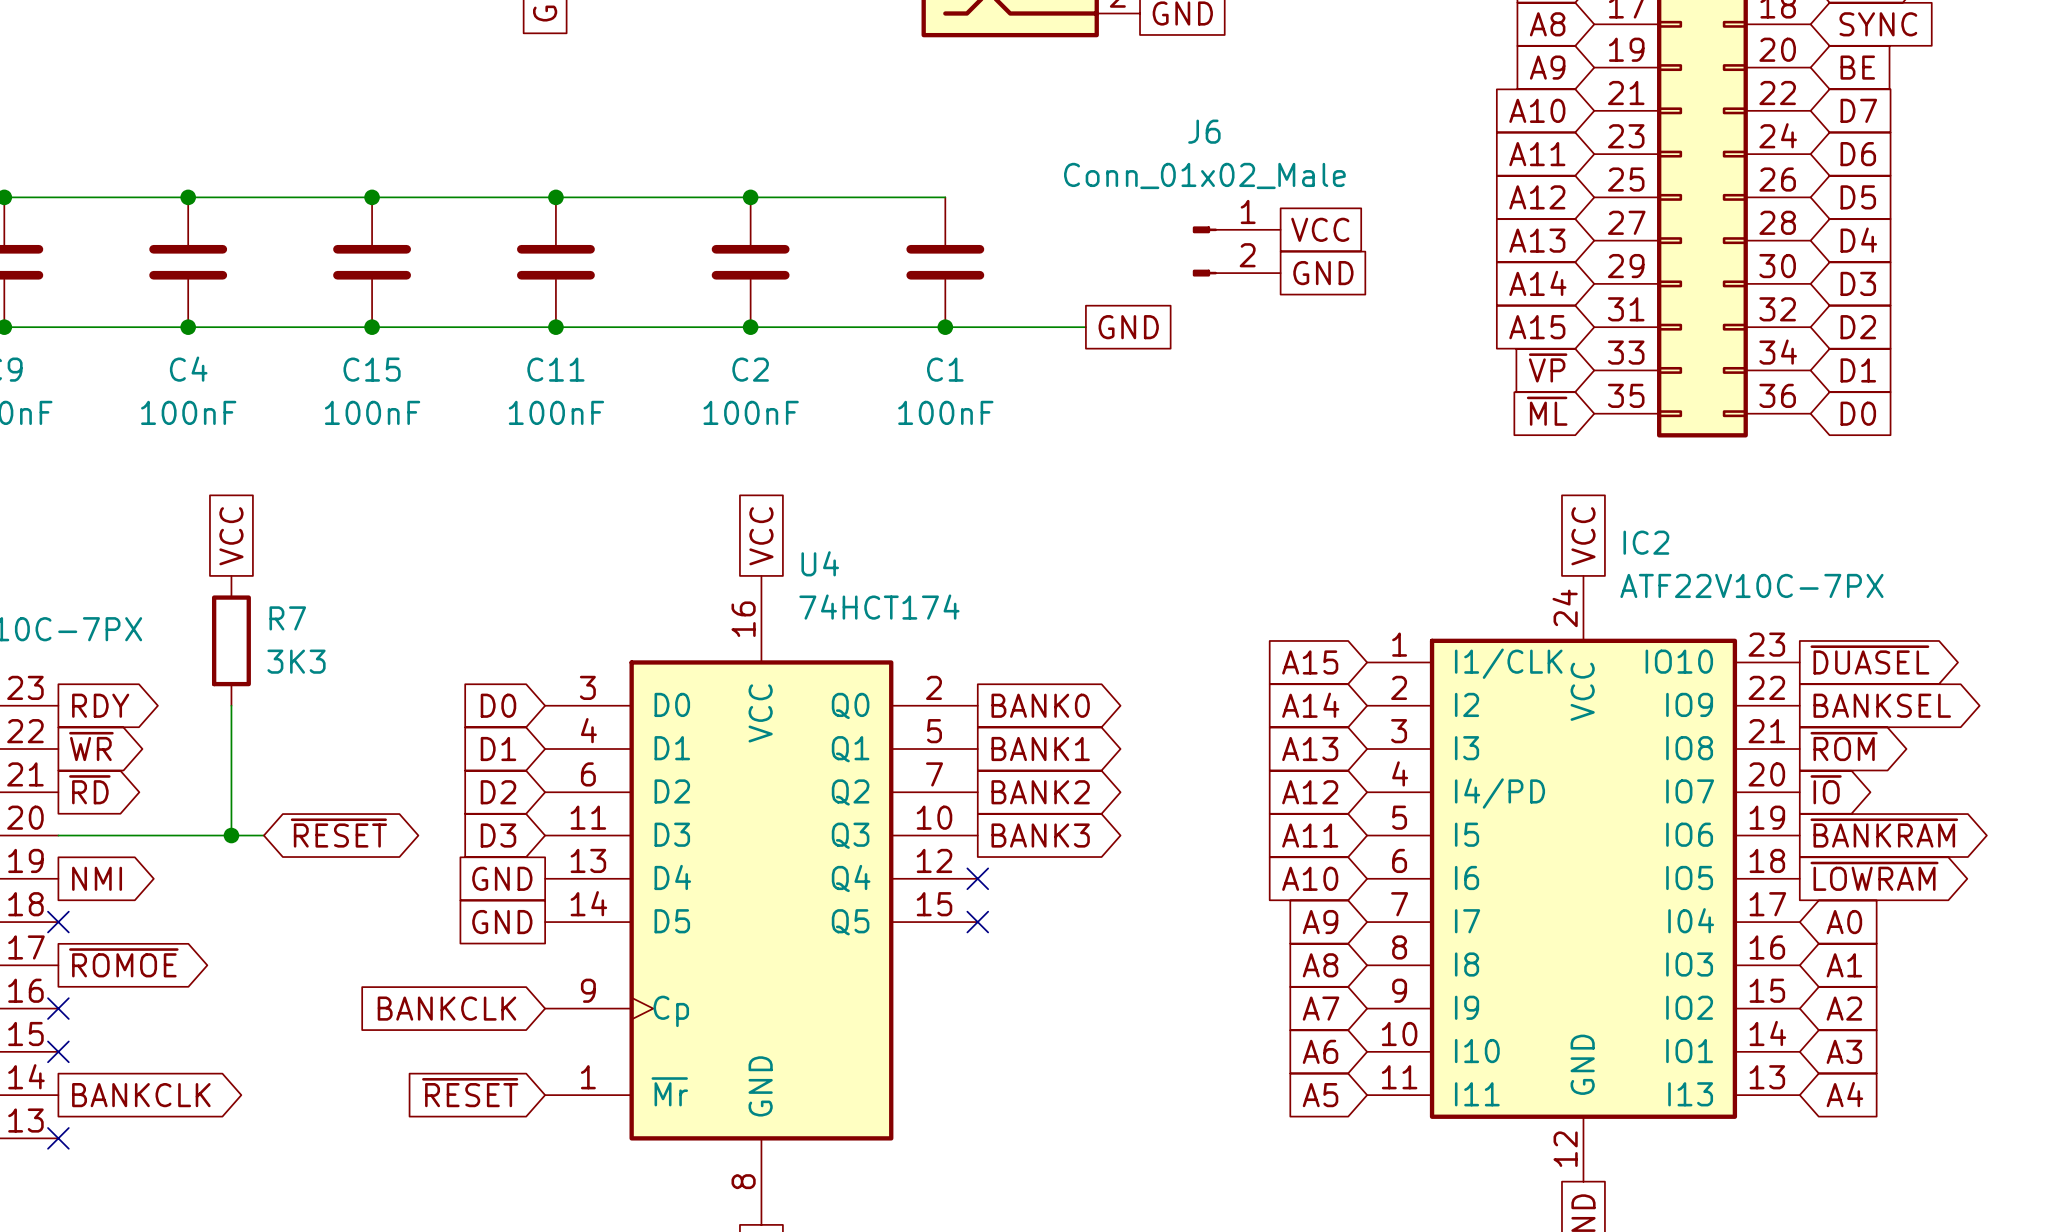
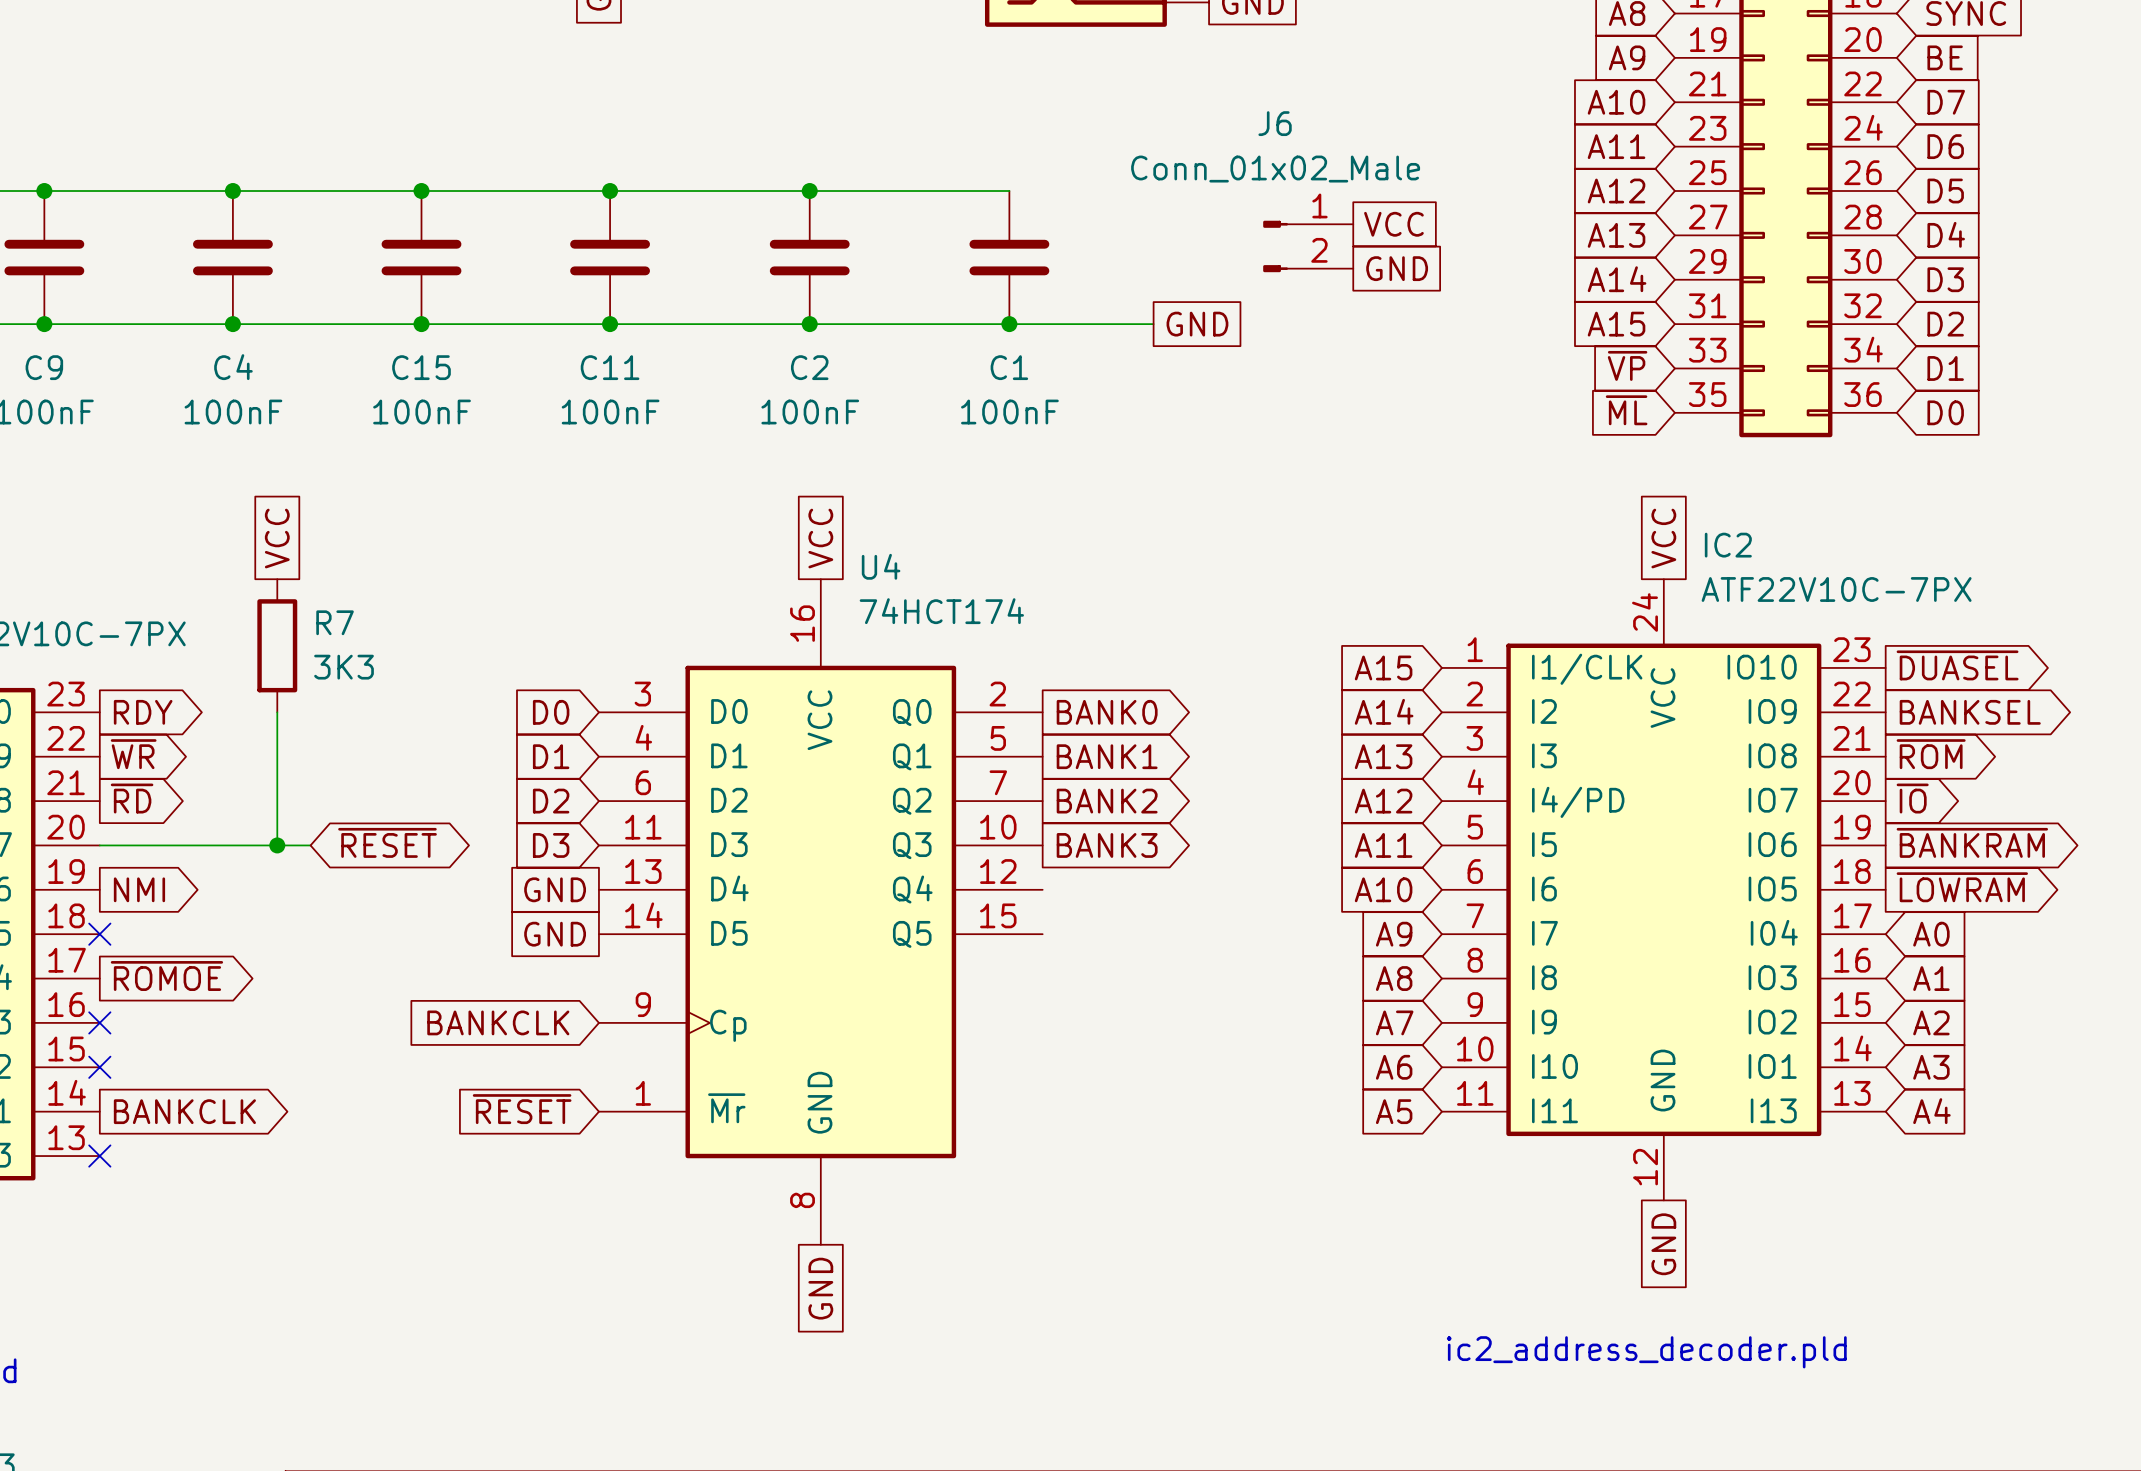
no-connect mark: (977, 878) -> none
no-connect mark: (977, 922) -> none

